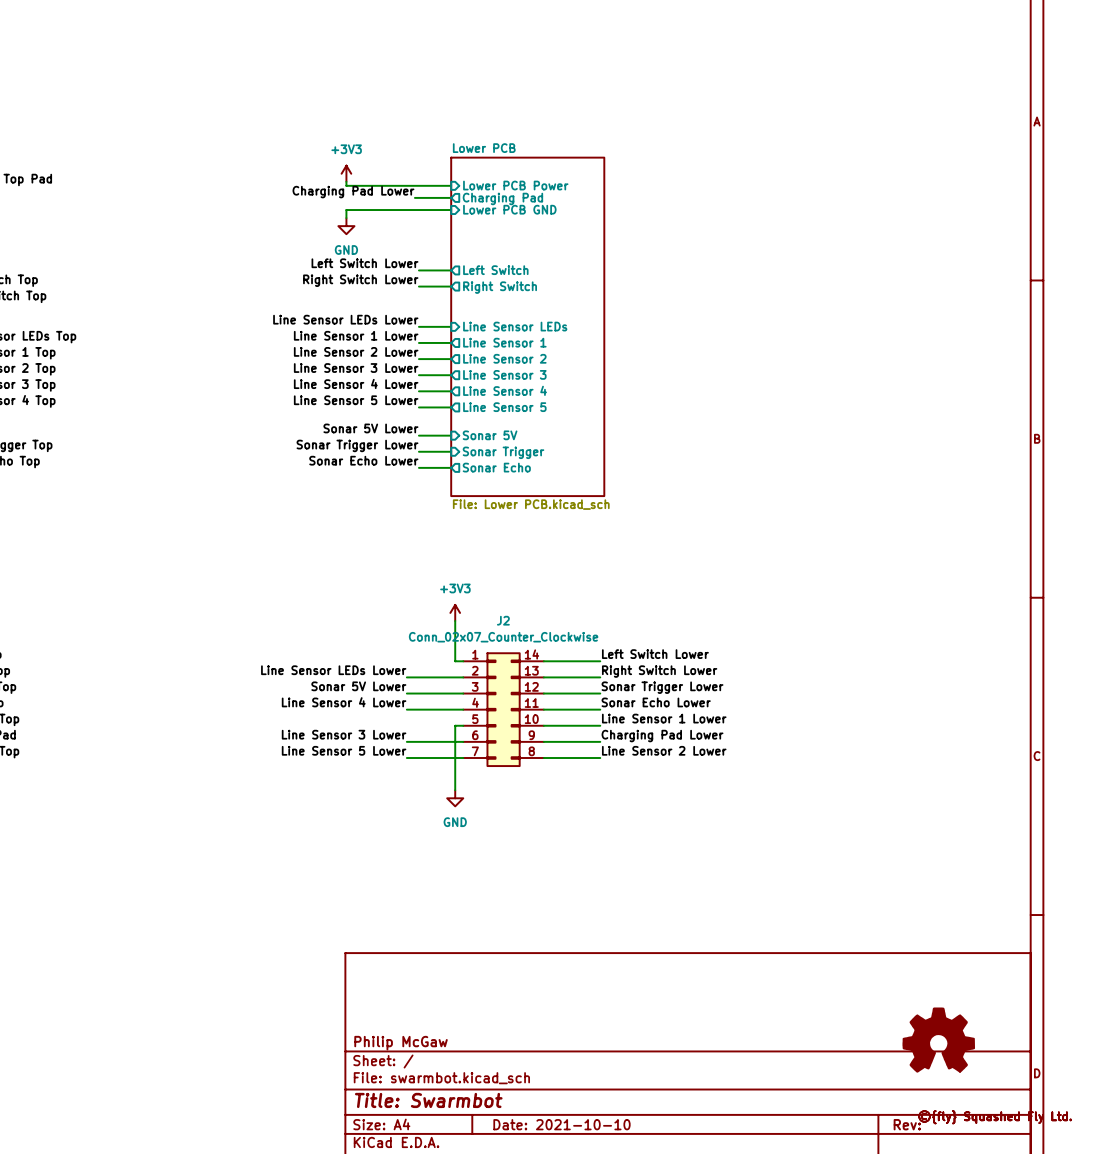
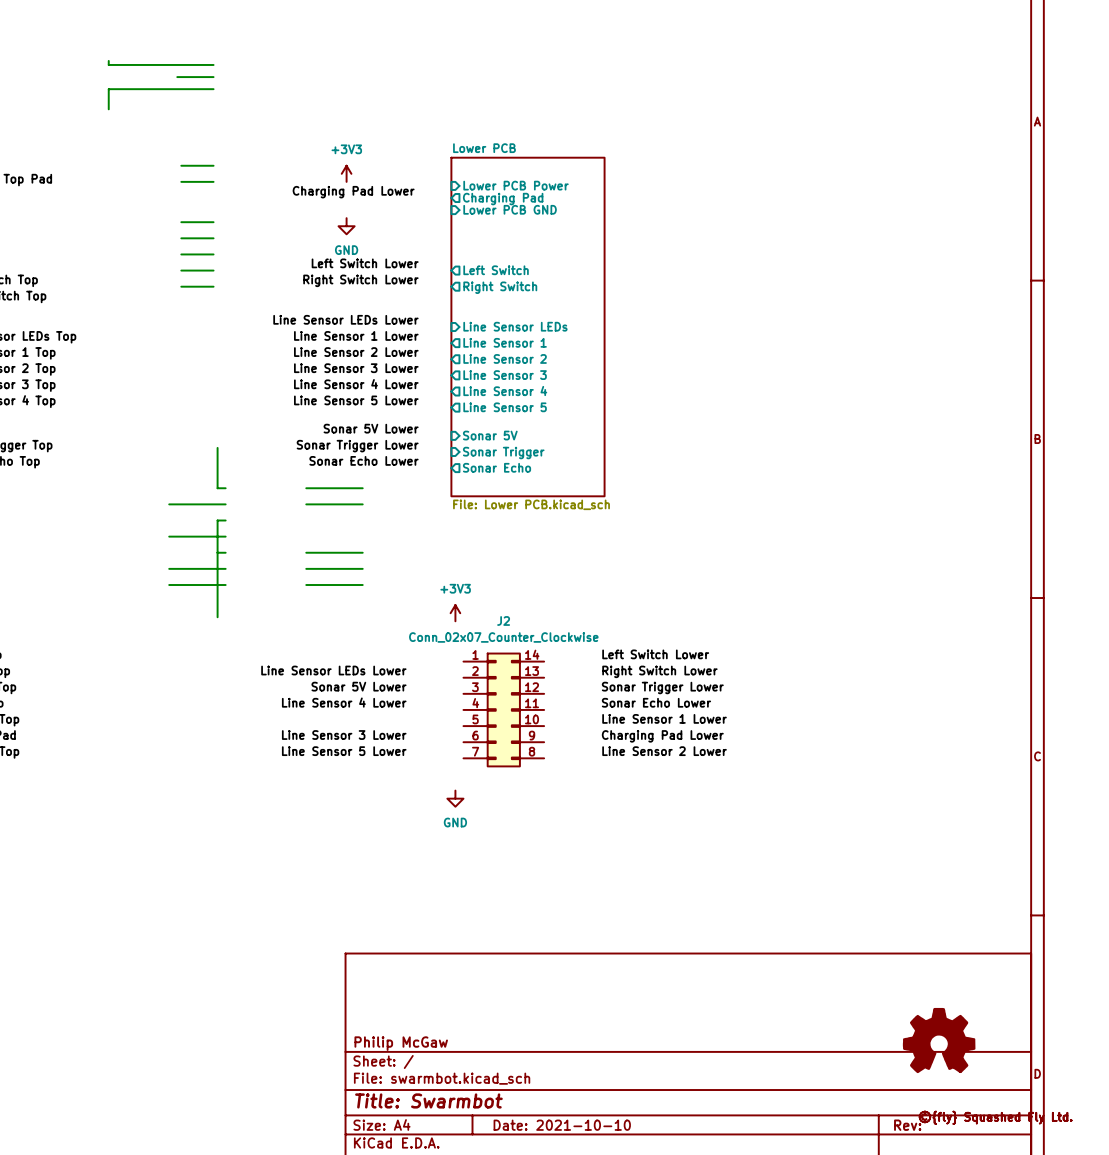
wire: none -> (108, 60) (108, 64) (213, 64)
wire: none -> (177, 77) (213, 77)
wire: none -> (213, 89) (108, 89) (108, 109)
wire: none -> (181, 165) (213, 165)
wire: none -> (181, 181) (213, 181)
wire: (346, 181) (346, 185) (451, 185) -> none
wire: (414, 197) (451, 197) -> none
wire: (451, 210) (346, 210) (346, 218) -> none
wire: none -> (181, 222) (213, 222)
wire: none -> (181, 238) (213, 238)
wire: none -> (181, 254) (213, 254)
wire: none -> (181, 270) (213, 270)
wire: (418, 270) (451, 270) -> none
wire: none -> (181, 286) (213, 286)
wire: (418, 286) (451, 286) -> none
wire: (418, 326) (451, 326) -> none
wire: (418, 342) (451, 342) -> none
wire: (418, 359) (451, 359) -> none
wire: (418, 375) (451, 375) -> none
wire: (418, 391) (451, 391) -> none
wire: (418, 407) (451, 407) -> none
wire: (418, 435) (451, 435) -> none
wire: none -> (217, 447) (217, 488) (225, 488)
wire: (418, 451) (451, 451) -> none
wire: (418, 467) (451, 467) -> none
wire: none -> (306, 488) (362, 488)
wire: none -> (169, 504) (225, 504)
wire: none -> (306, 504) (362, 504)
wire: none -> (225, 520) (217, 520) (217, 617)
wire: none -> (169, 536) (225, 536)
wire: none -> (217, 552) (225, 552)
wire: none -> (306, 552) (362, 552)
wire: none -> (169, 568) (225, 568)
wire: none -> (169, 585) (225, 585)
wire: (455, 621) (455, 661) (463, 661) -> none
wire: (543, 661) (600, 661) -> none
wire: (406, 677) (463, 677) -> (306, 568) (362, 568)
wire: (543, 677) (600, 677) -> none
wire: (406, 693) (463, 693) -> (306, 585) (362, 585)
wire: (543, 693) (600, 693) -> none
wire: (406, 709) (463, 709) -> none
wire: (543, 709) (600, 709) -> none
wire: (463, 725) (455, 725) (455, 790) -> none
wire: (543, 725) (600, 725) -> none
wire: (406, 741) (463, 741) -> none
wire: (543, 741) (600, 741) -> none
wire: (406, 758) (463, 758) -> none
wire: (543, 758) (600, 758) -> none

